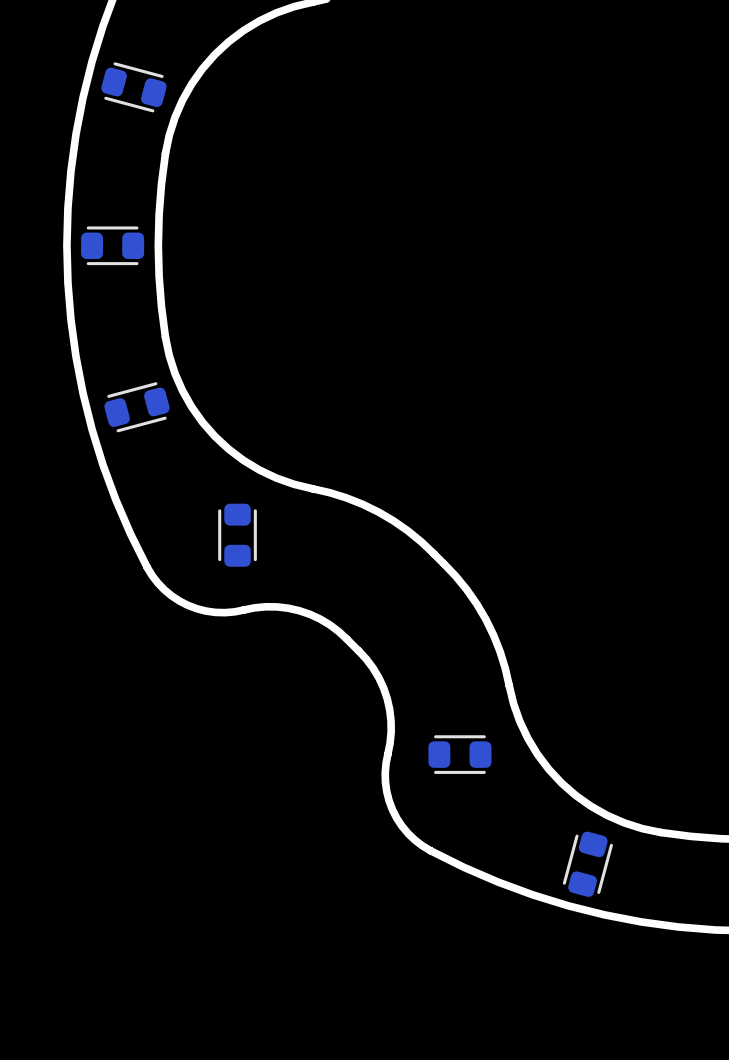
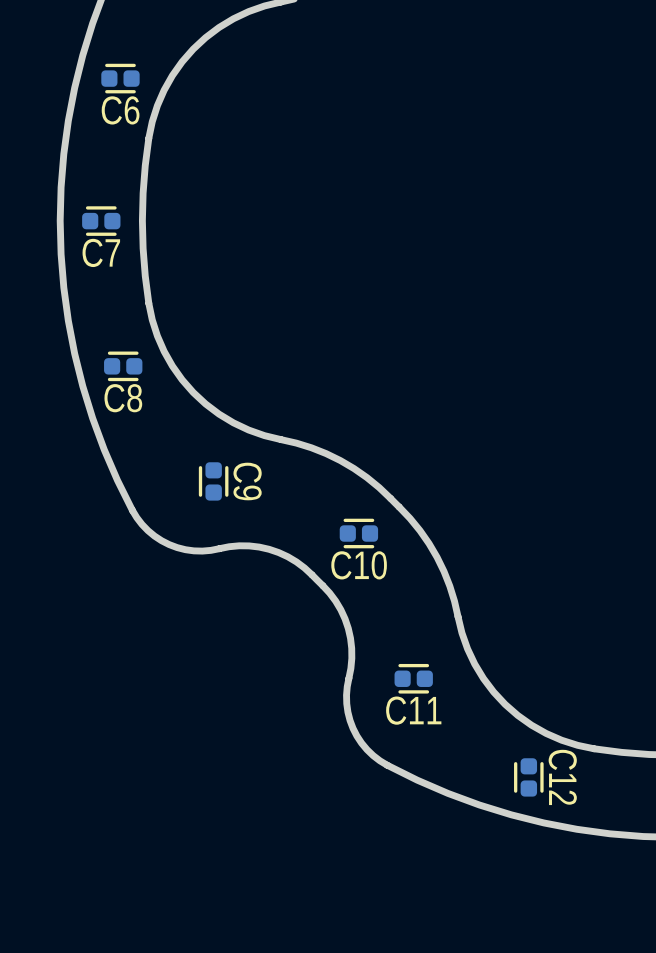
part: (133, 87) -> none
C6: none -> (120, 78)
part: (112, 245) -> none
C7: none -> (101, 221)
part: (136, 407) -> none
C8: none -> (123, 366)
part: (237, 535) -> none
C9: none -> (213, 481)
C10: none -> (358, 533)
part: (459, 754) -> none
C11: none -> (413, 678)
part: (587, 864) -> none
C12: none -> (528, 777)

